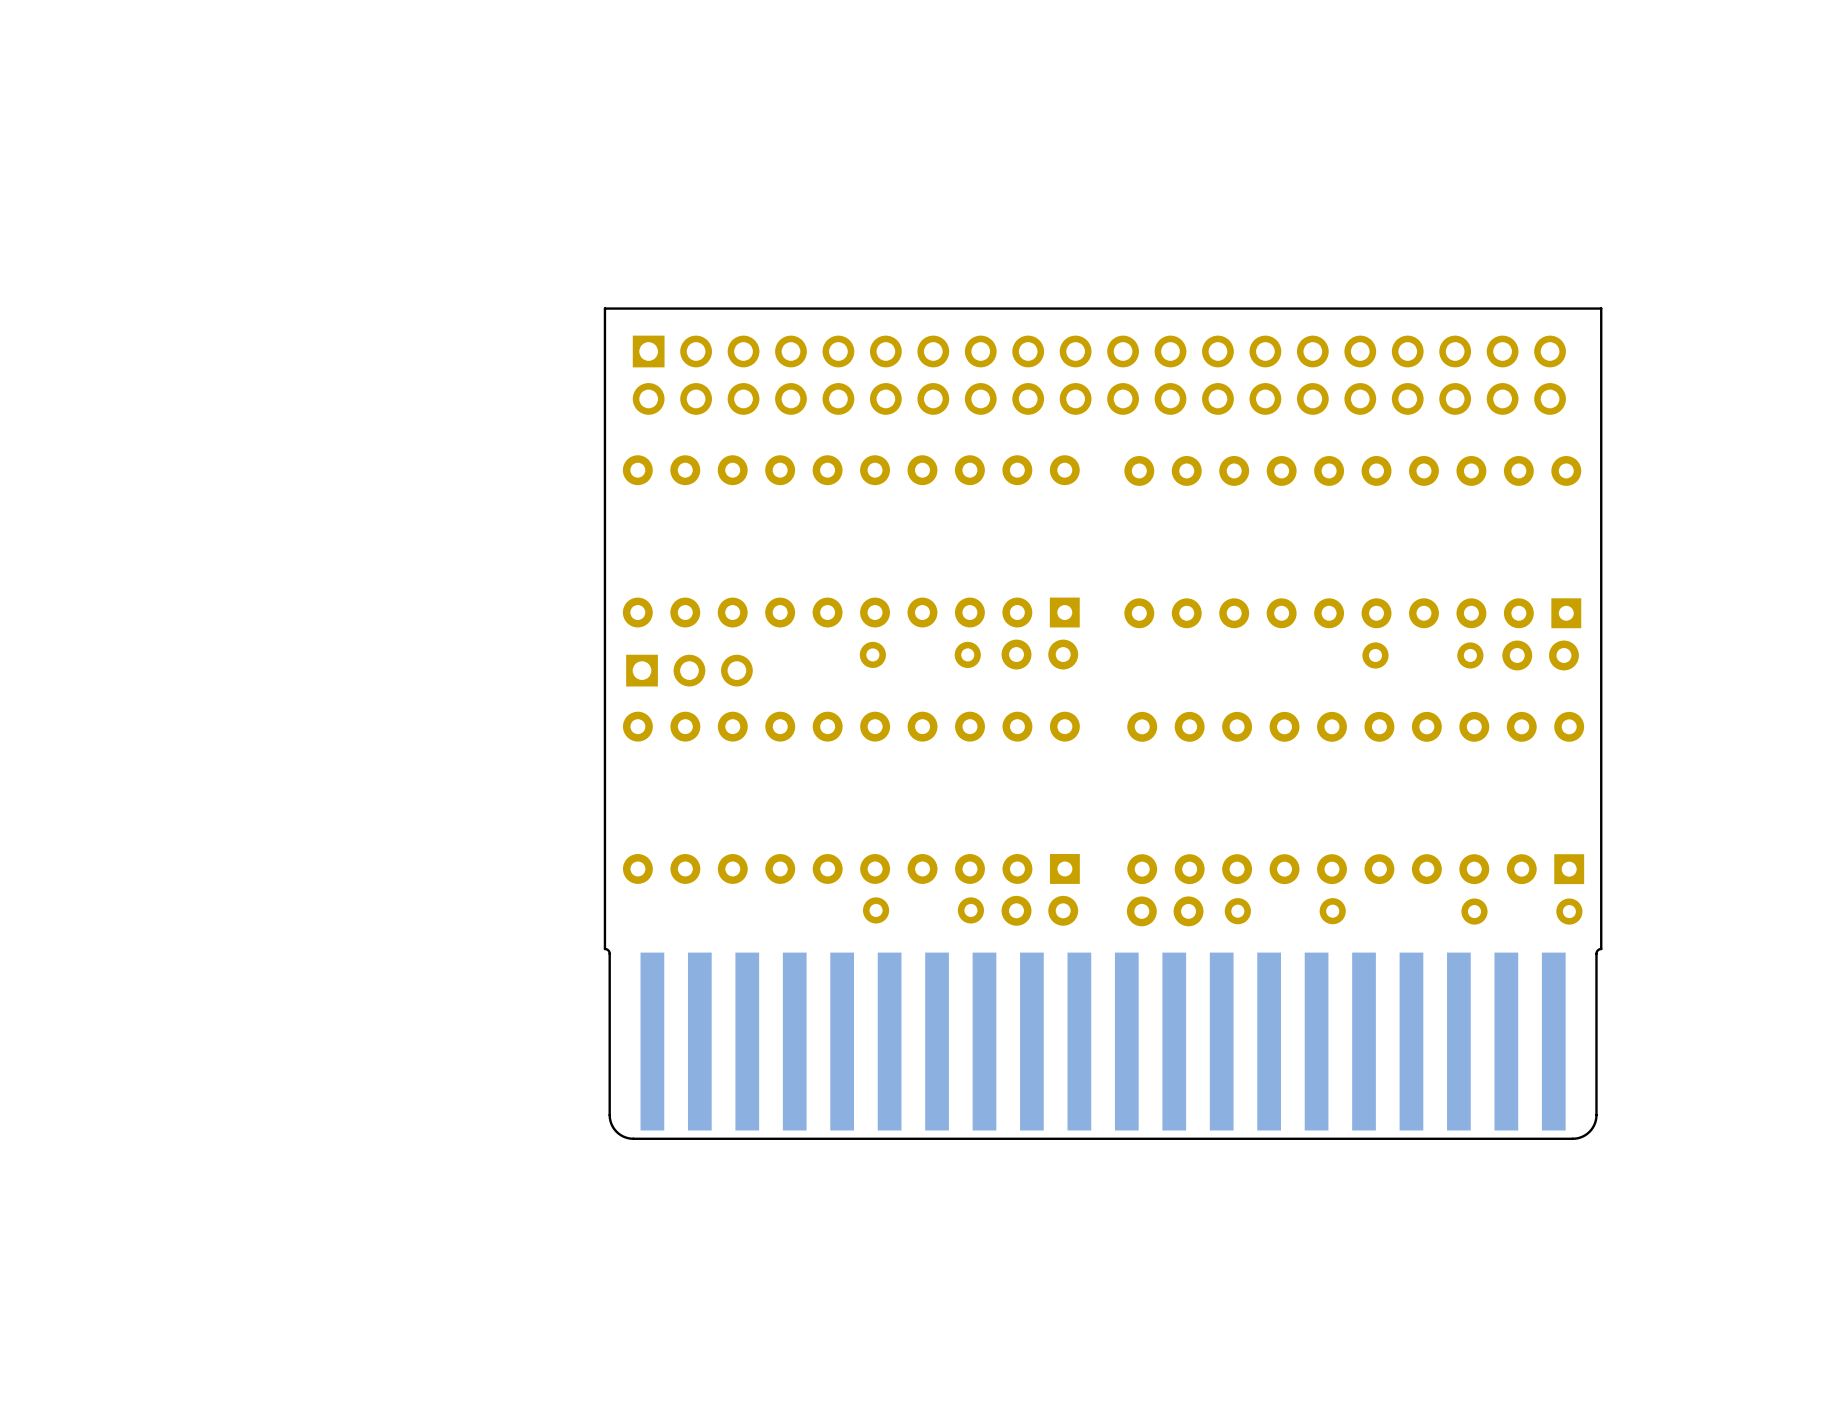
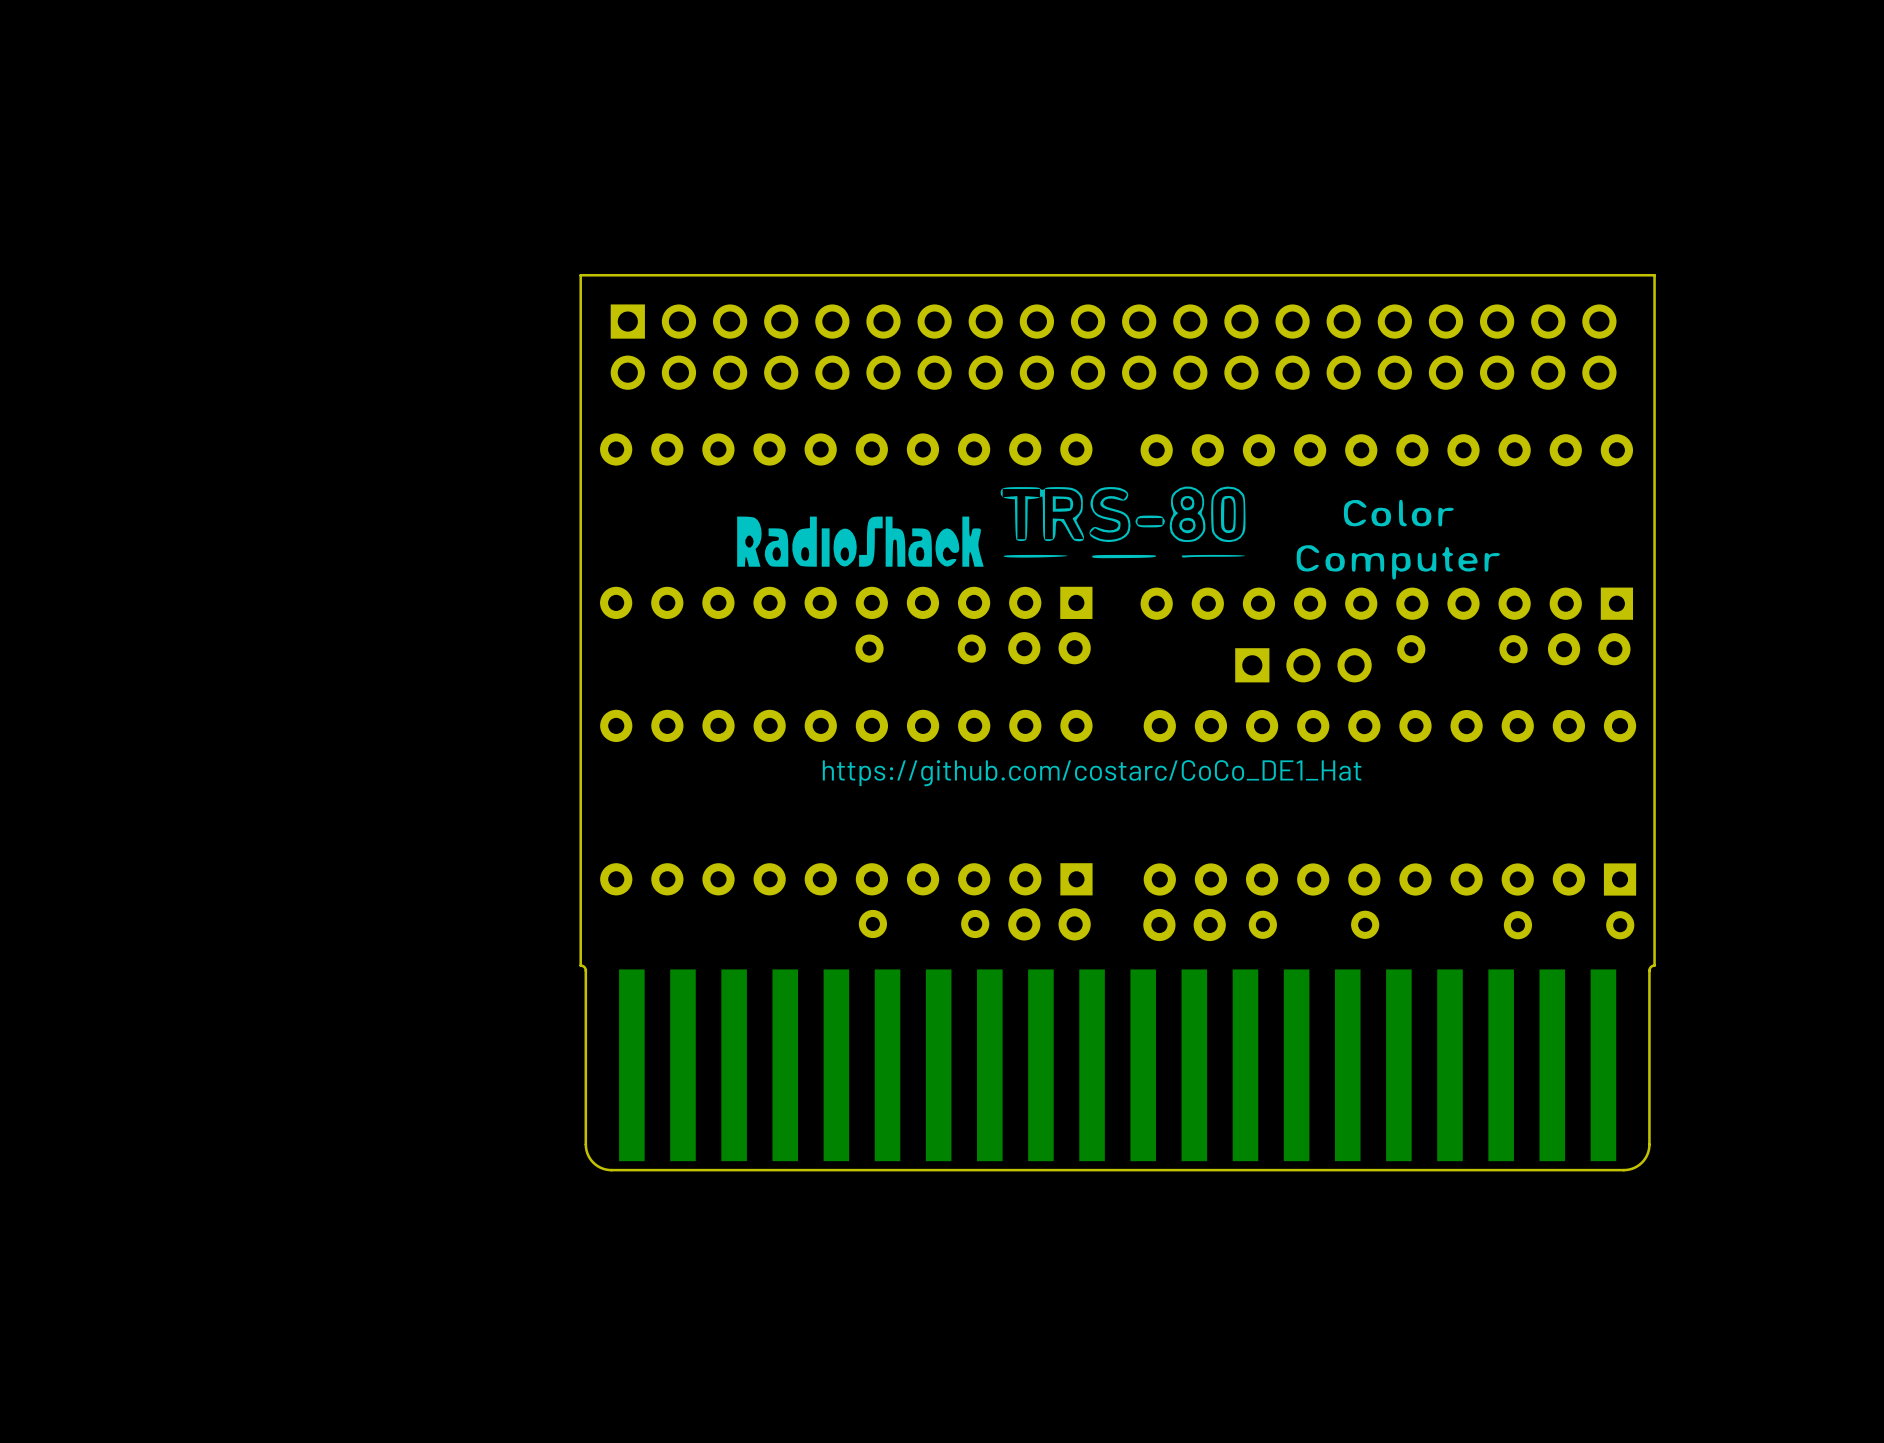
drawing: none -> [737, 486, 1500, 580]
part: (689, 670) -> none
part: none -> (1303, 665)
text: none -> https://github.com/costarc/CoCo_DE1_Hat (1092, 773)

